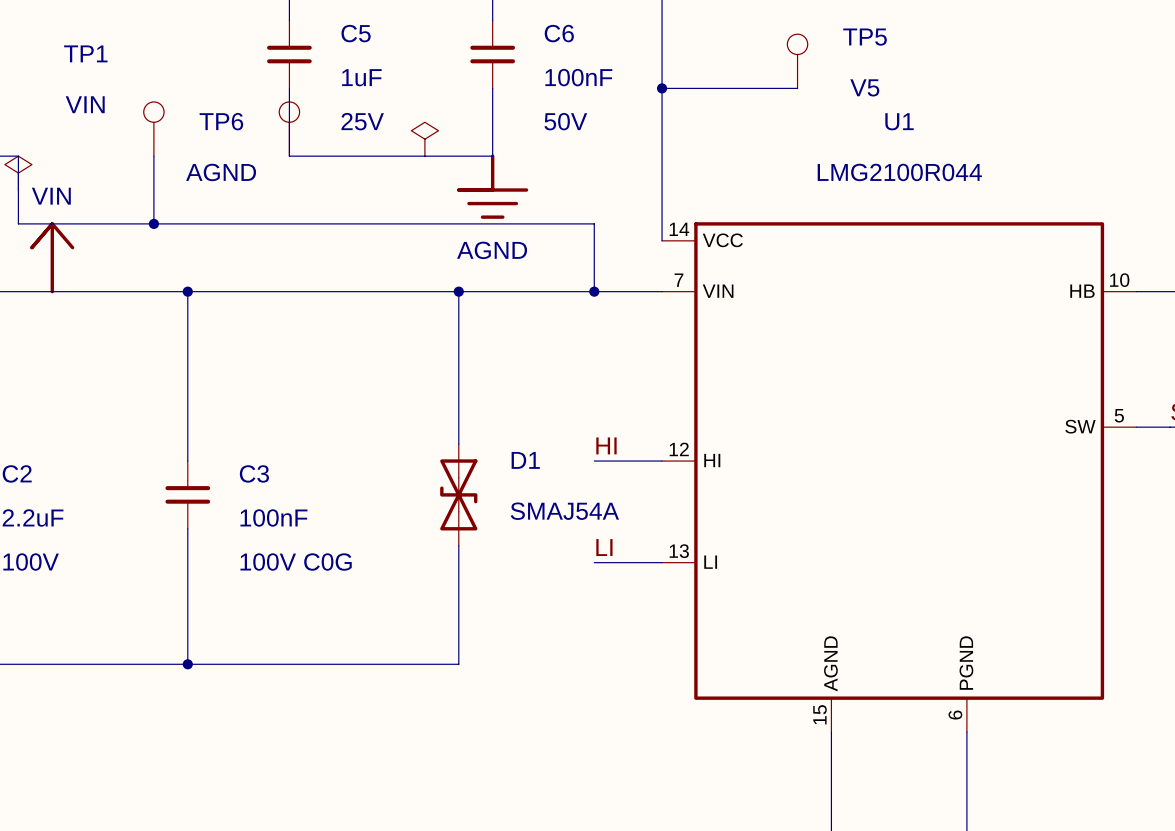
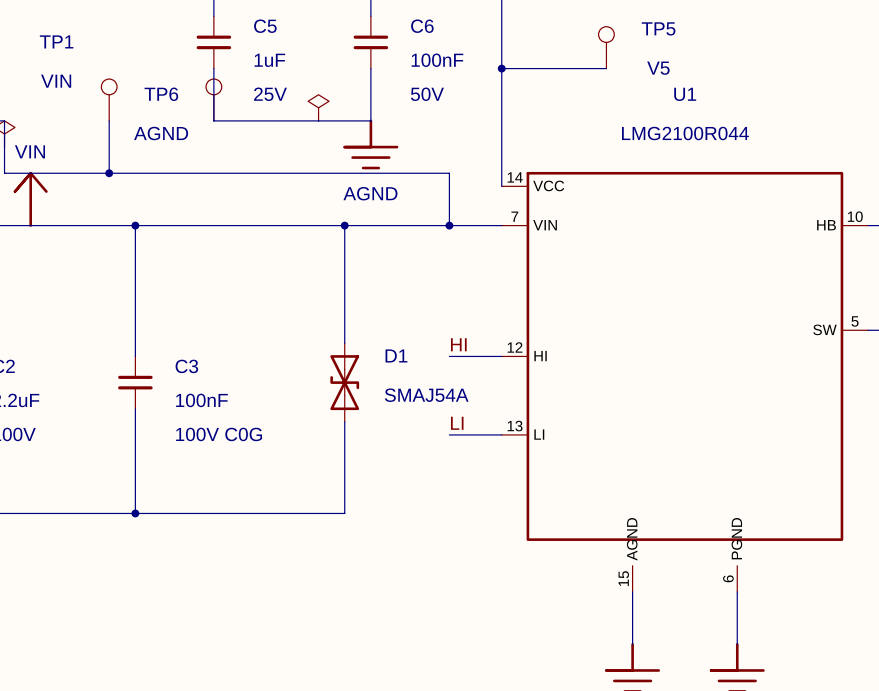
U1 symbol: [662, 222, 1137, 733] -> [501, 171, 869, 592]

